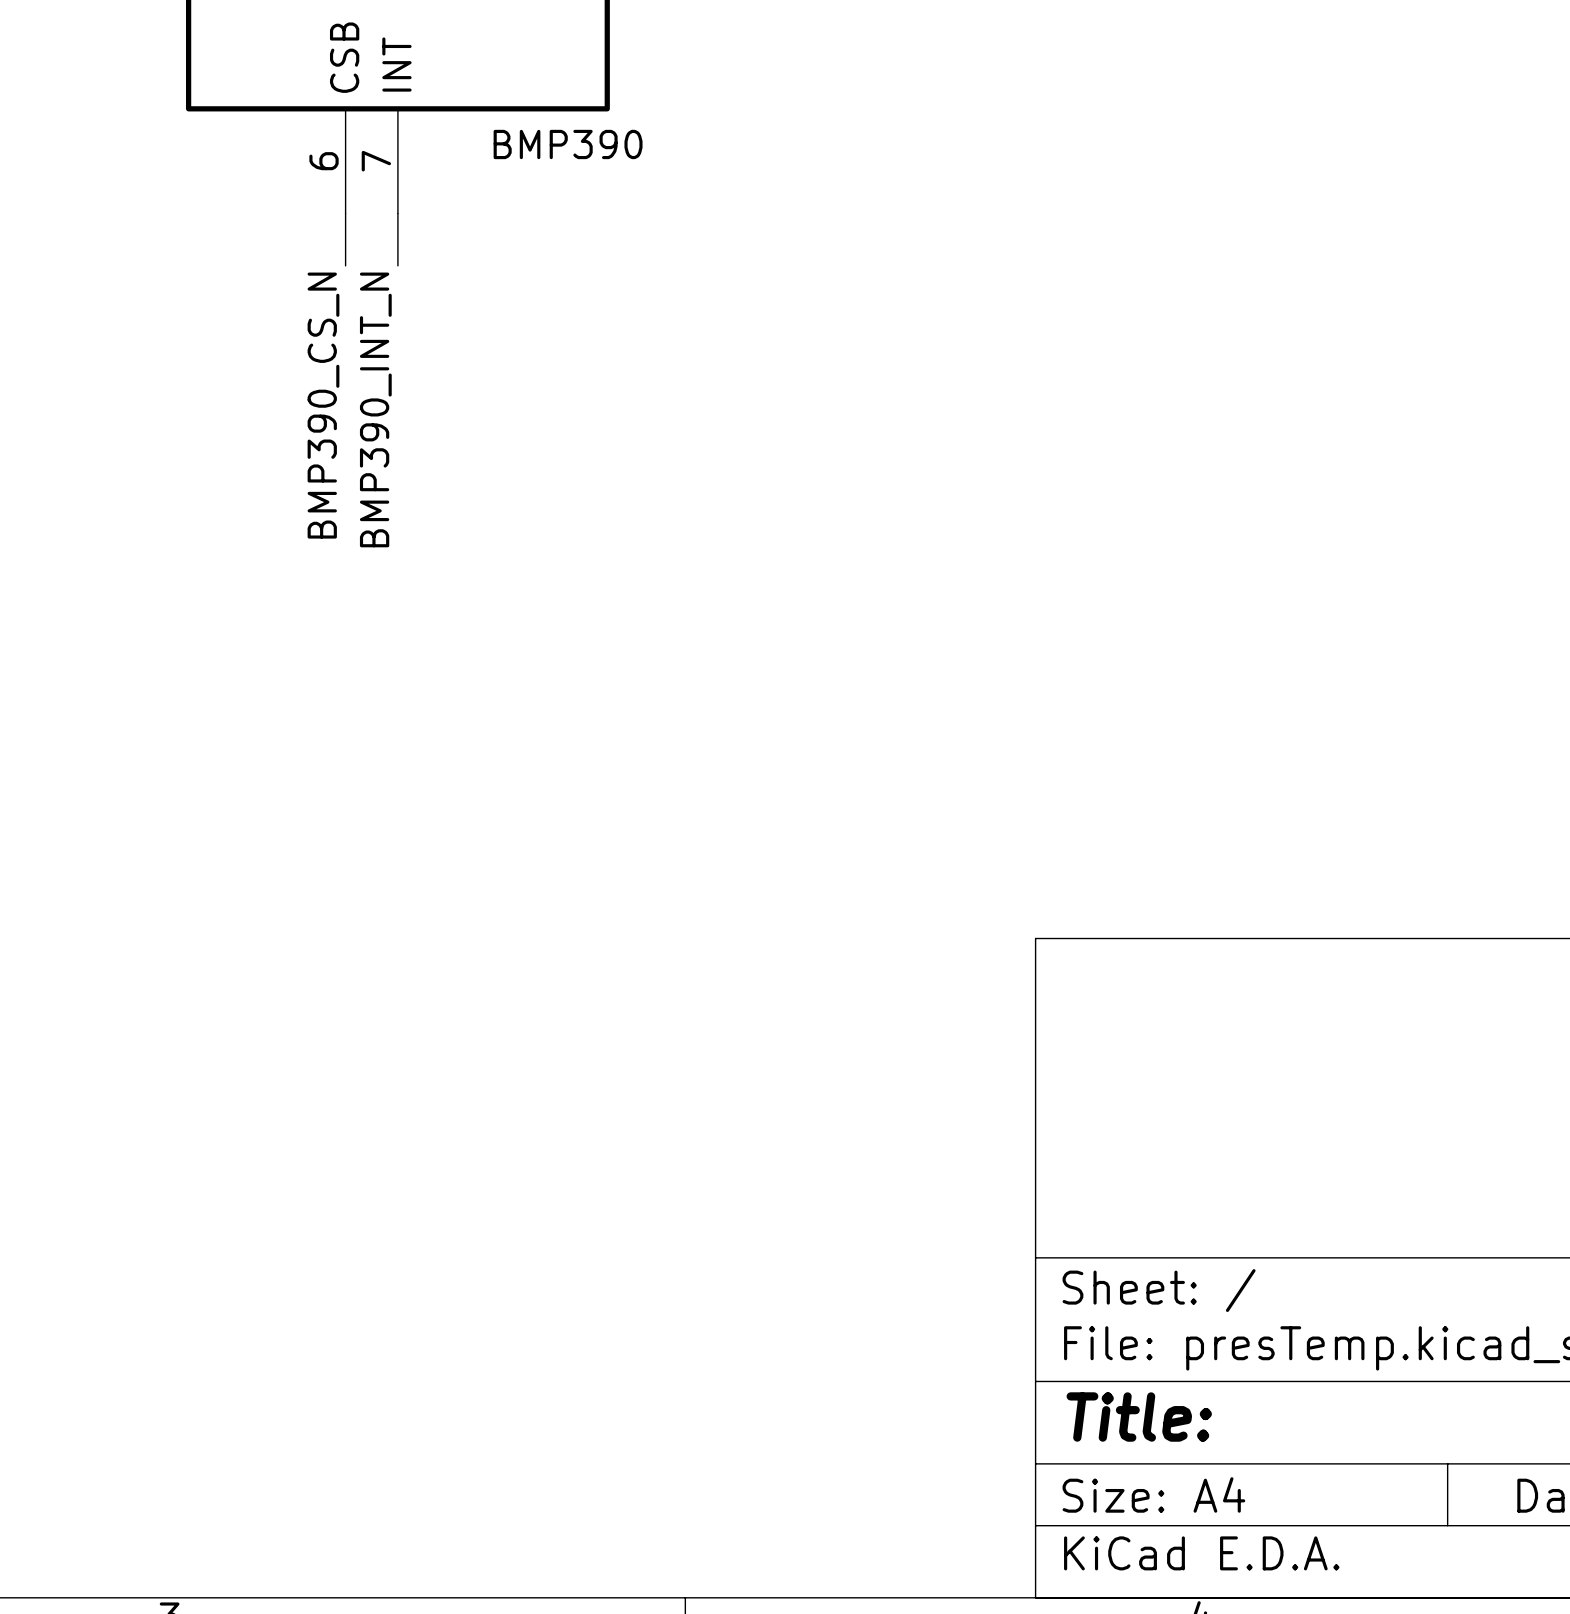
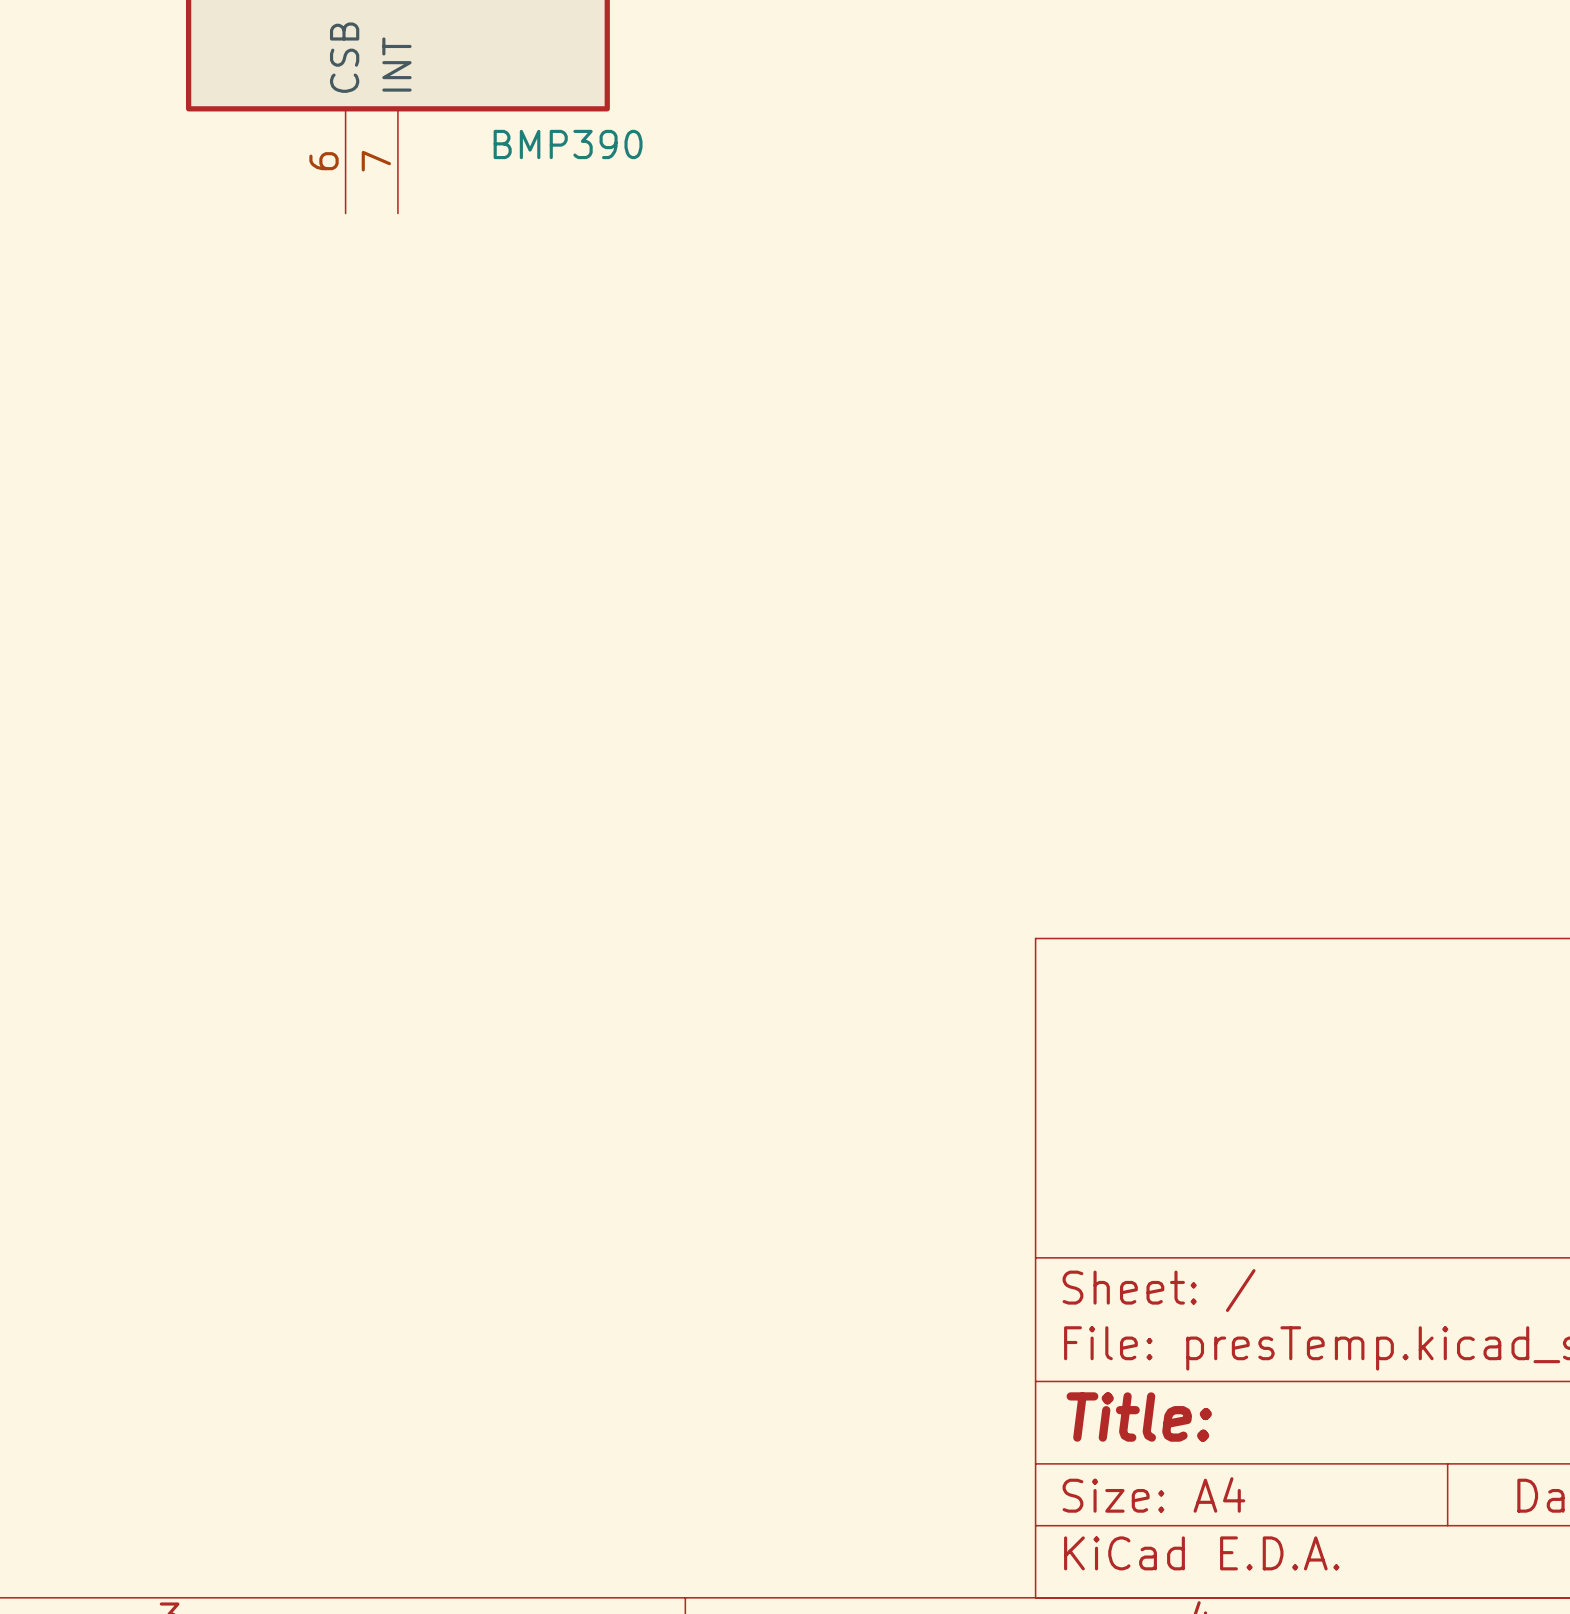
wire: (345, 213) (345, 265) -> none
wire: (397, 213) (397, 265) -> none
label: BMP390_CS_N (323, 405) -> none
label: BMP390_INT_N (375, 409) -> none

